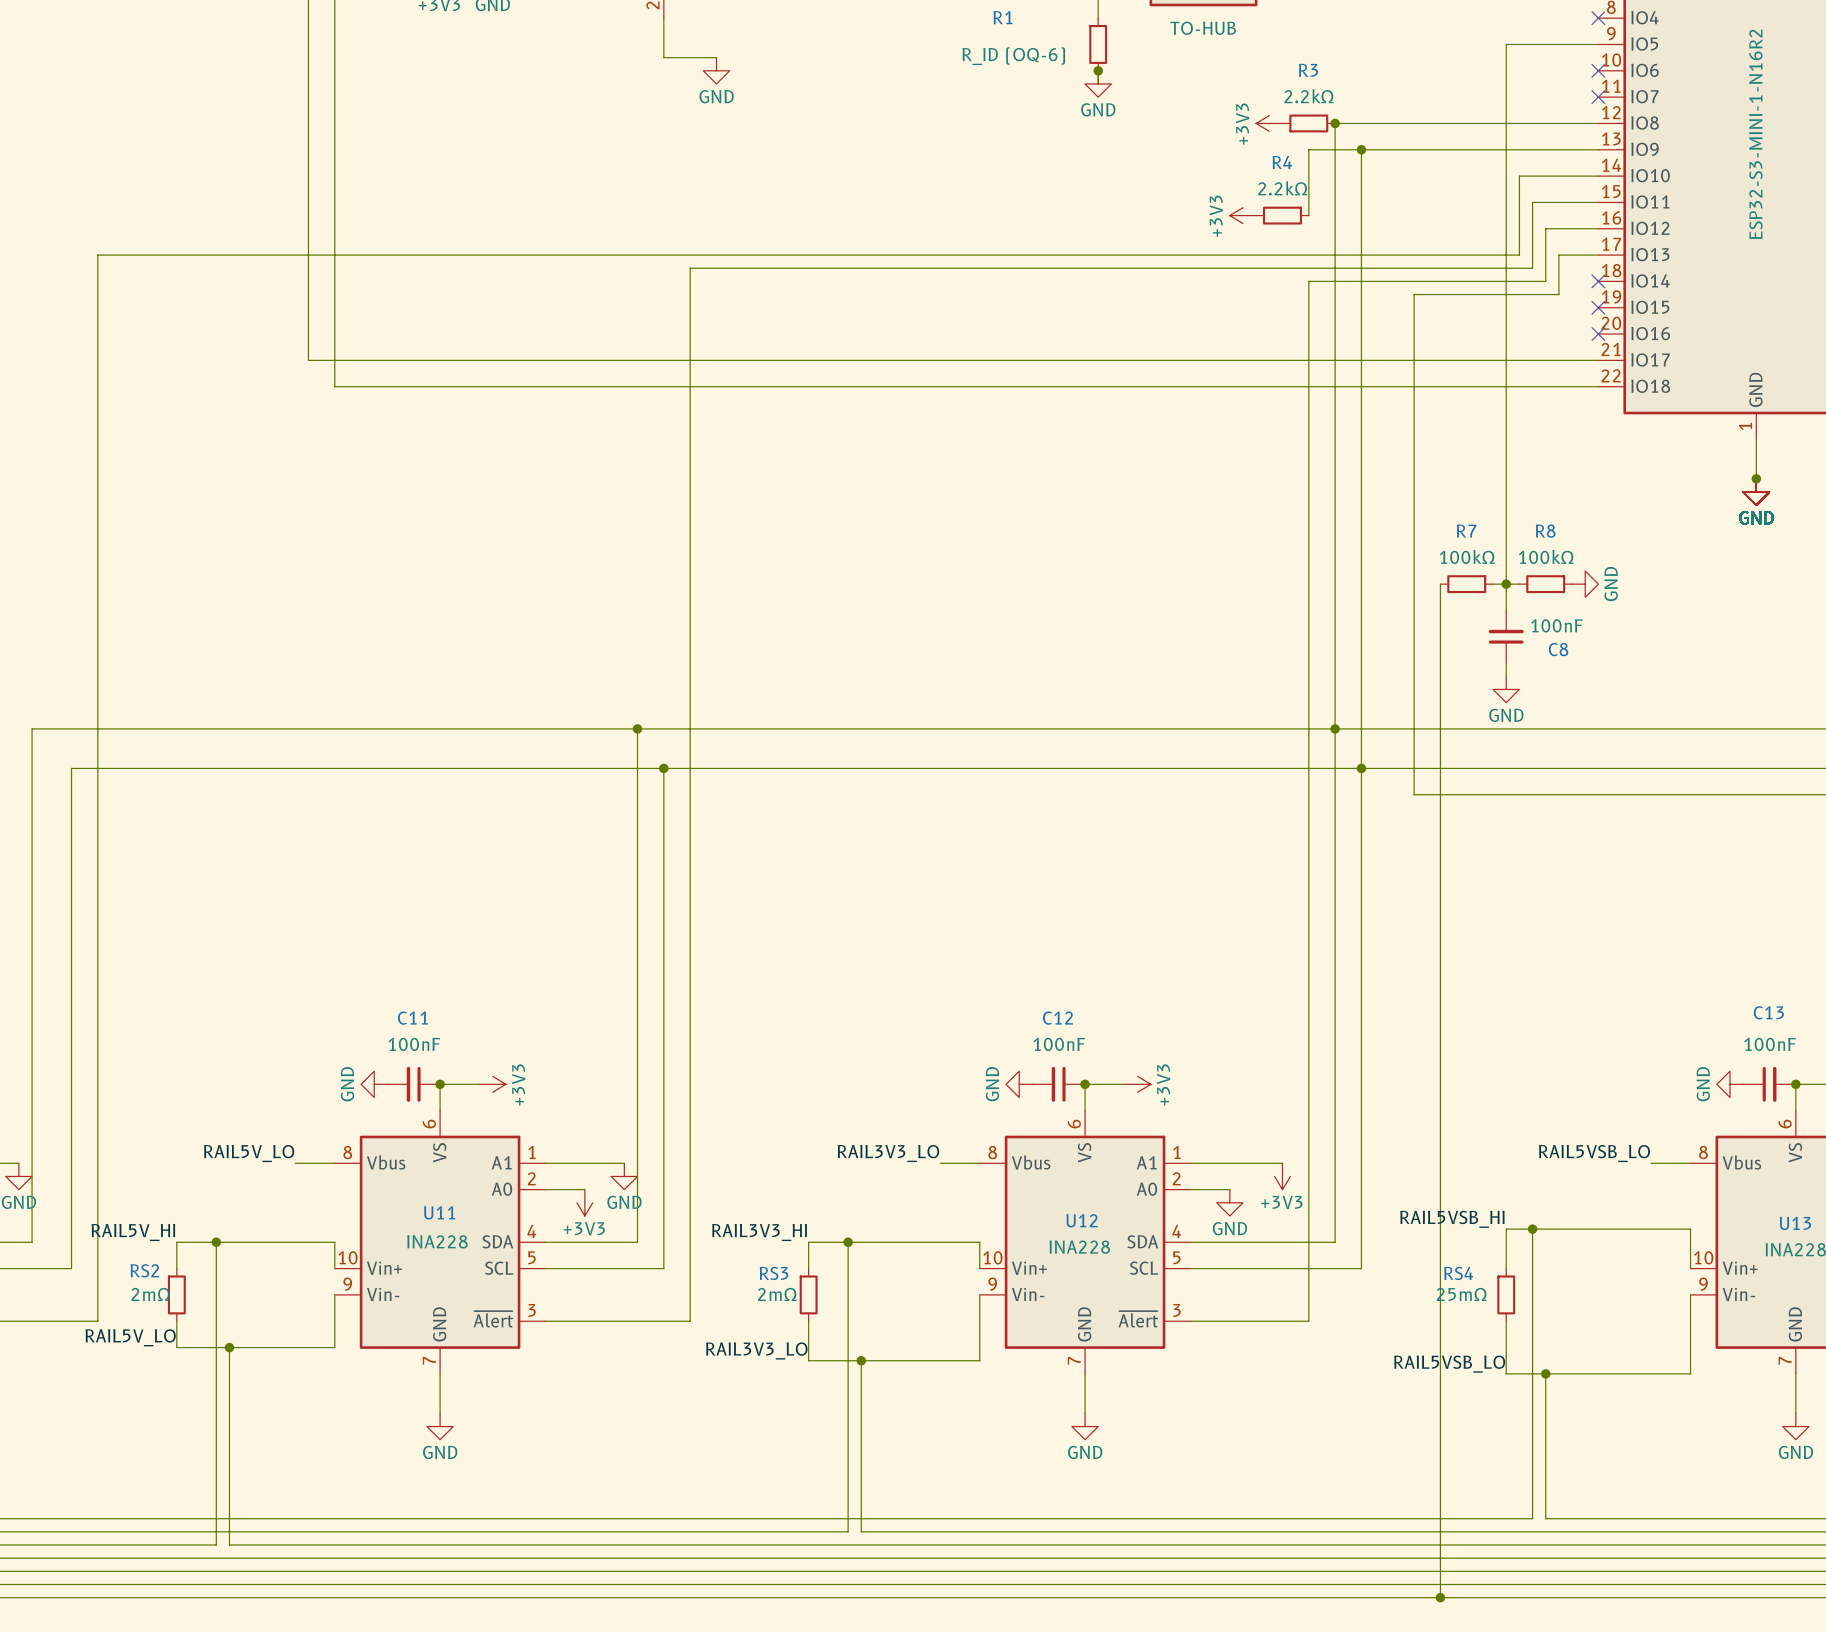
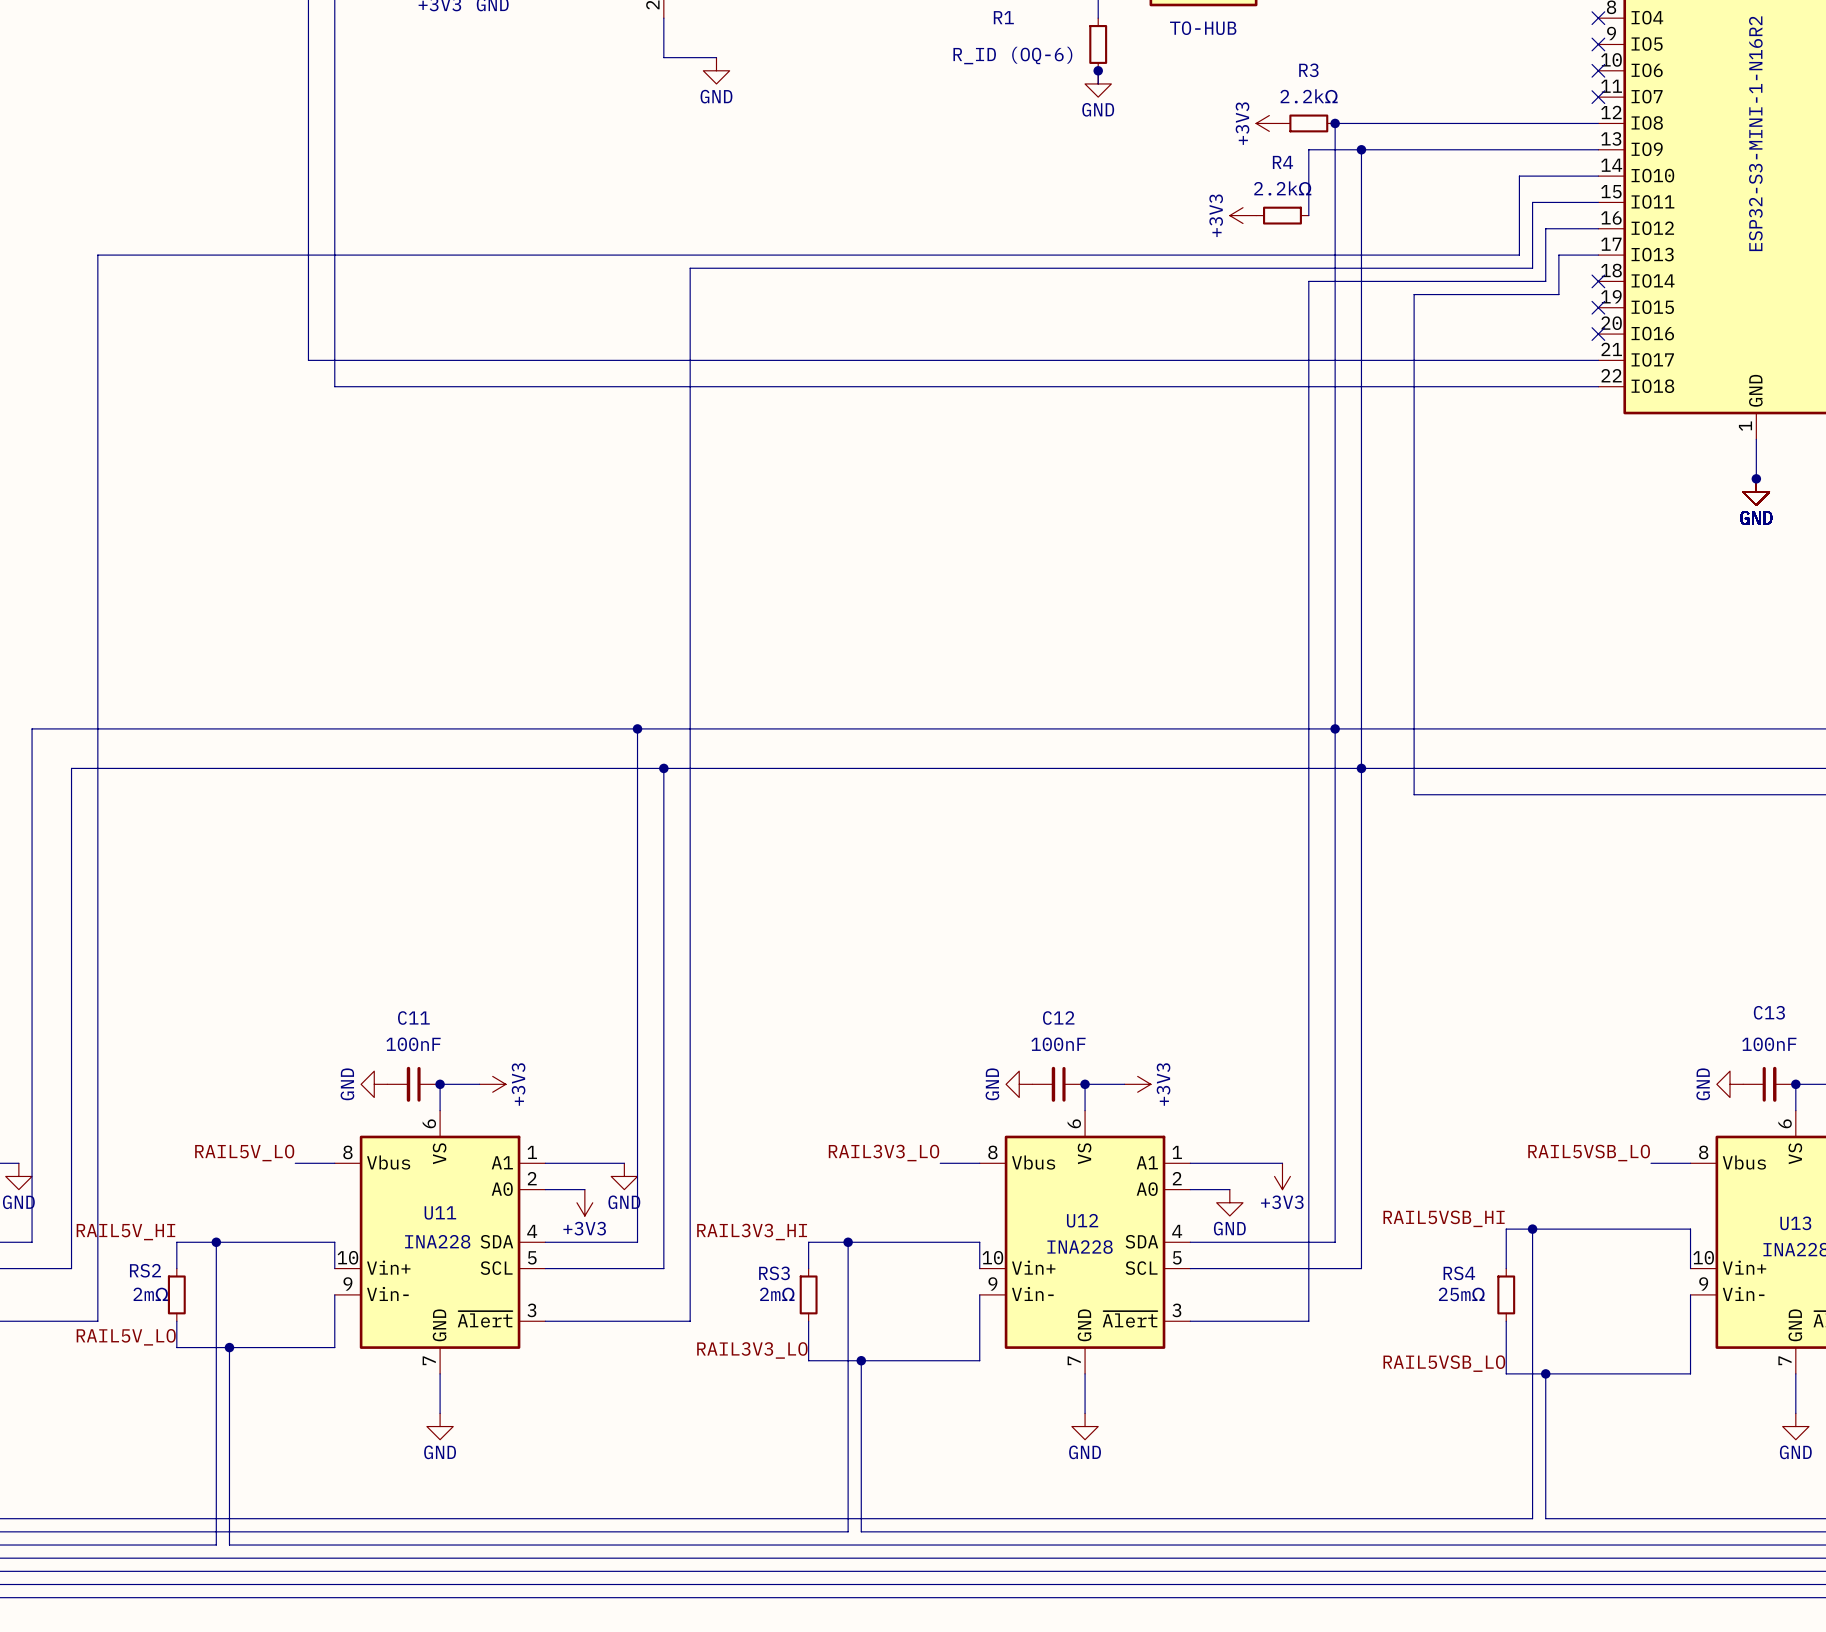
wire: (1598, 44) (1506, 44) (1506, 610) -> none
no-connect mark: none -> (1598, 44)
wire: (1440, 584) (1440, 1597) -> none
R7: 100kΩ (1466, 584) -> none
wire: (1493, 584) (1519, 584) -> none
junction: (1506, 584) -> none
R8: 100kΩ (1545, 584) -> none
power symbol: GND (1585, 584) -> none
C8: 100nF (1506, 636) -> none
wire: (1506, 663) (1506, 676) -> none
power symbol: GND (1506, 689) -> none
junction: (1440, 1597) -> none

